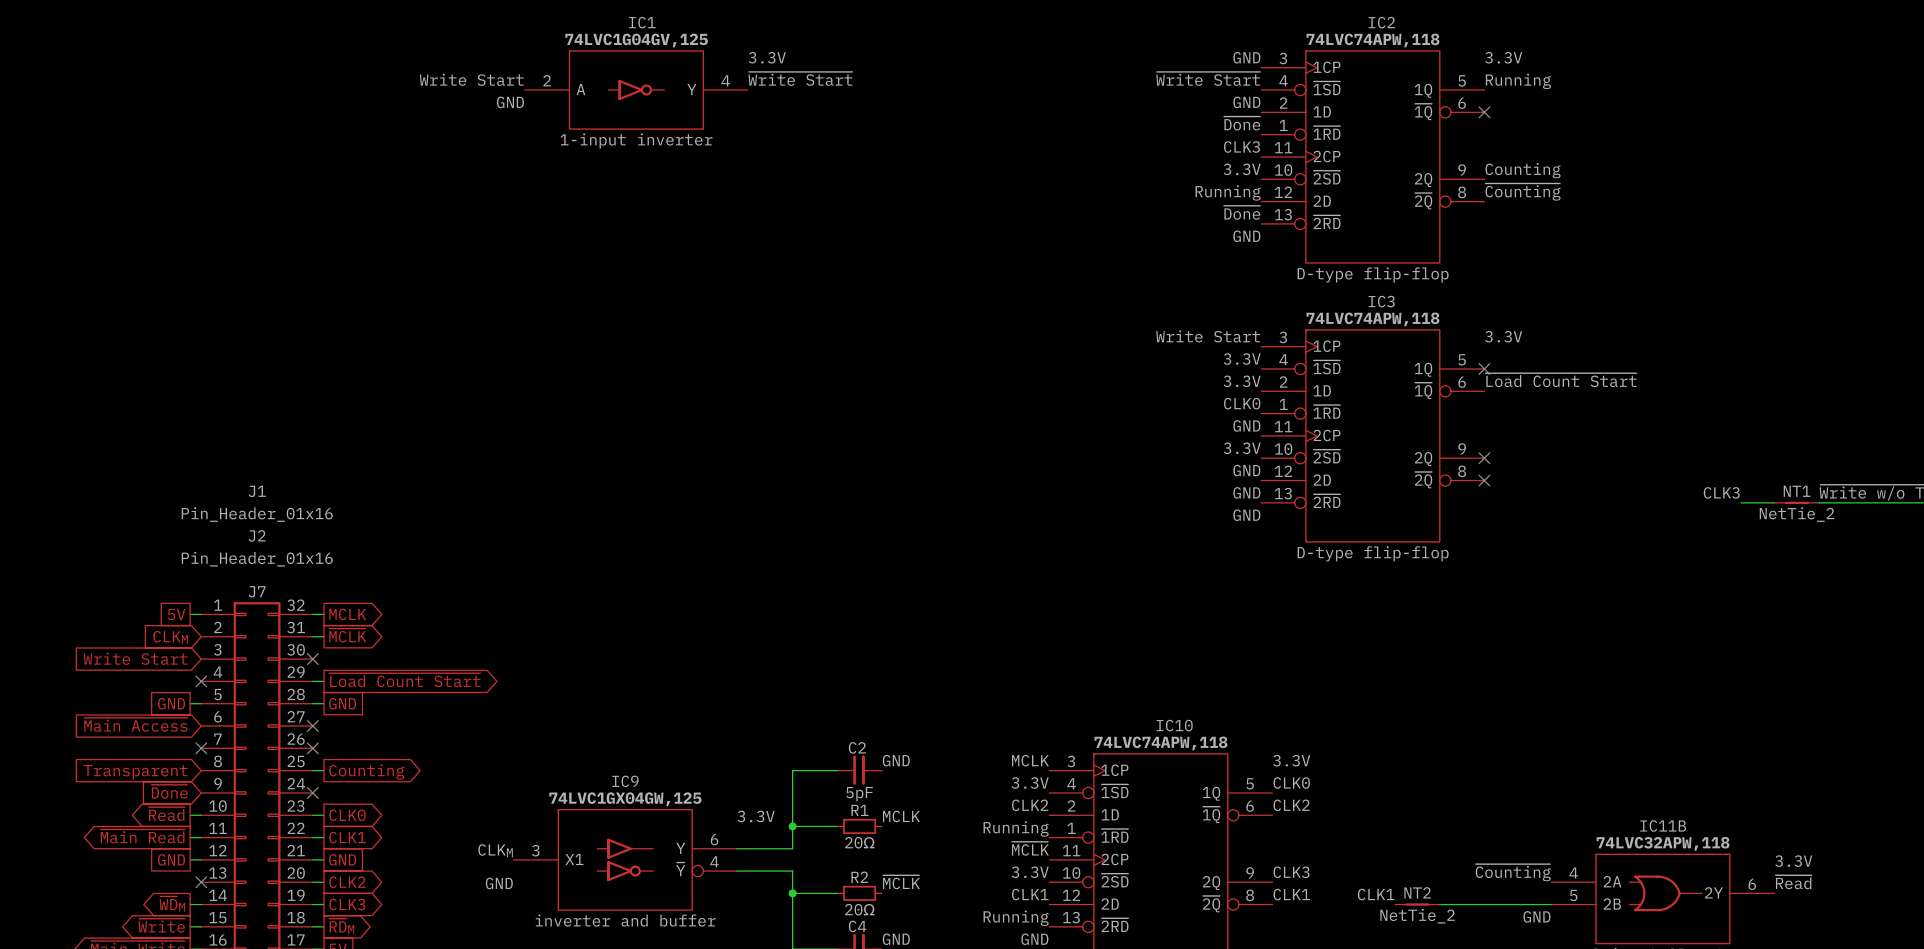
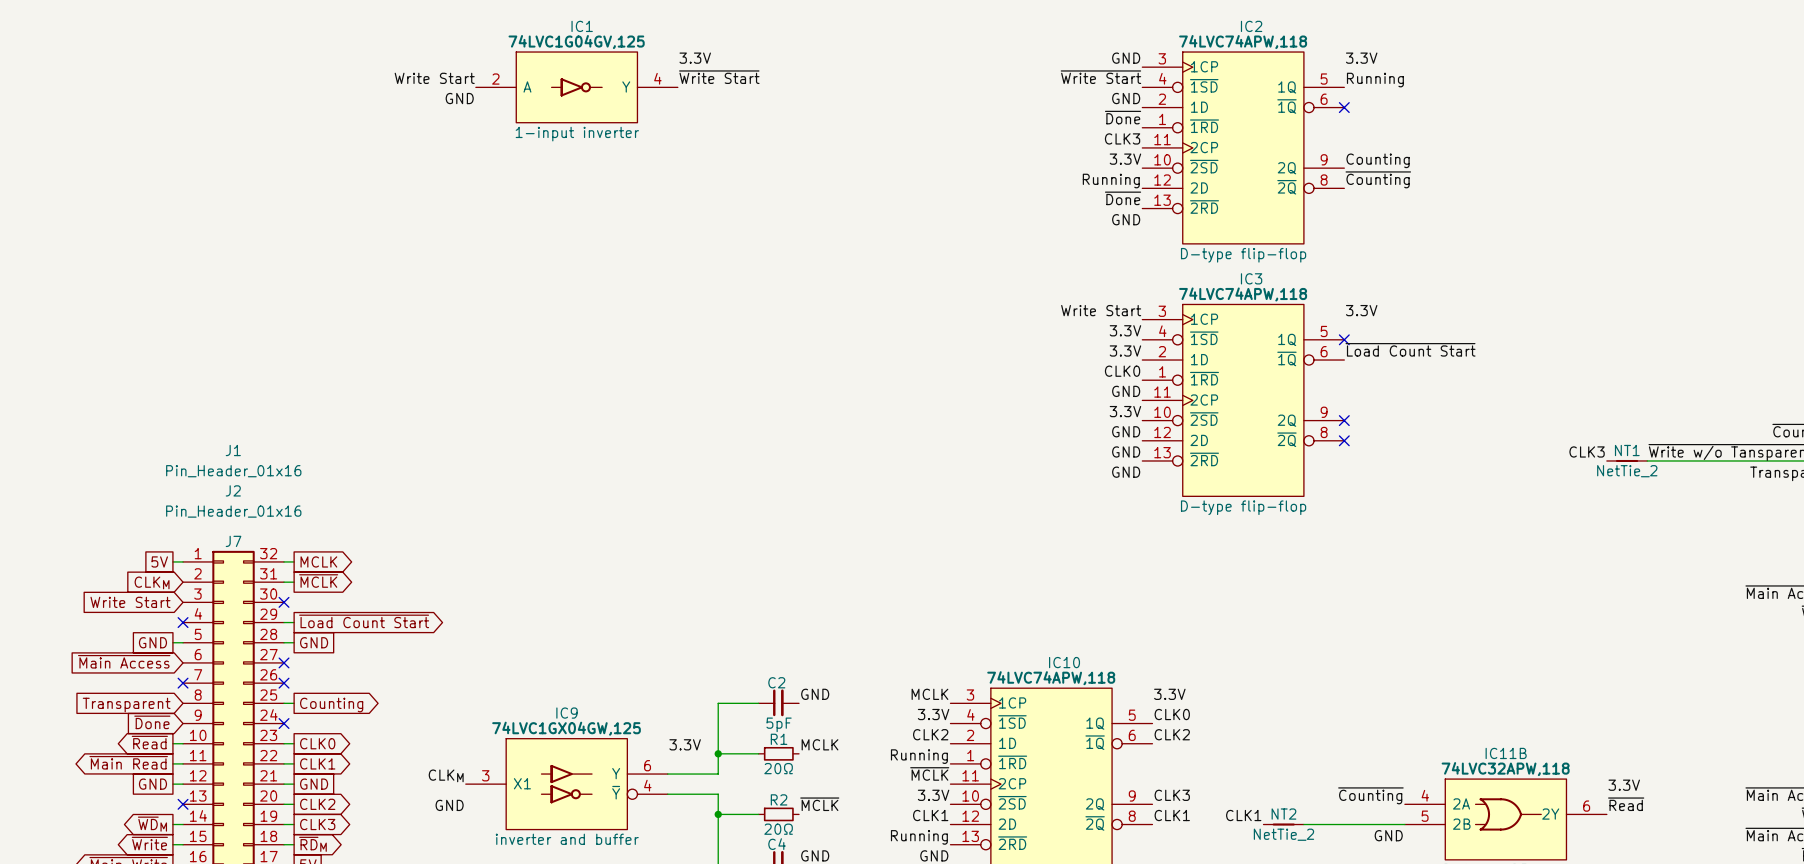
label position: CLK3 (1721, 492) -> CLK3 (1587, 451)
wire: (1741, 502) (1774, 502) -> none

